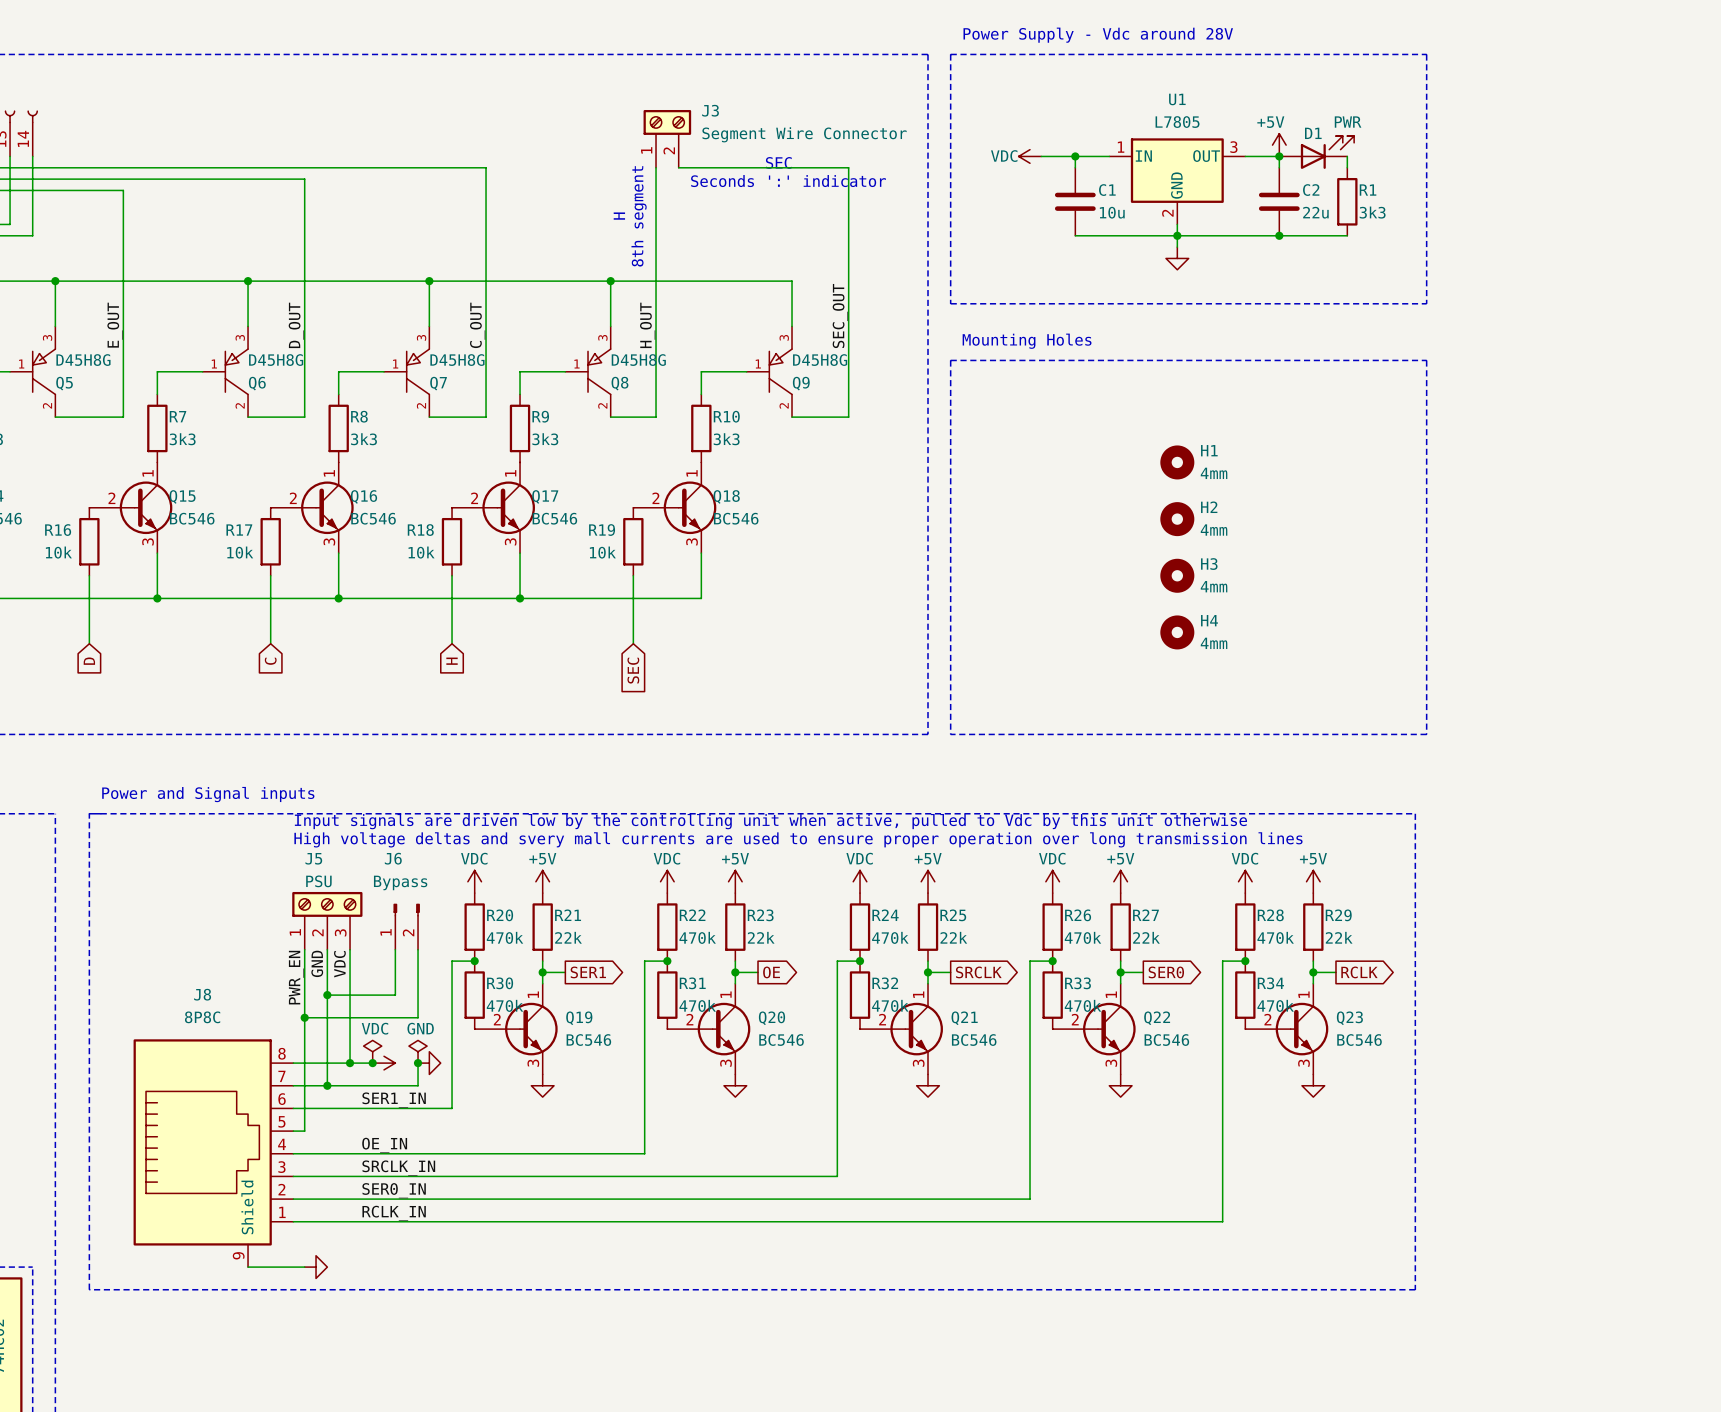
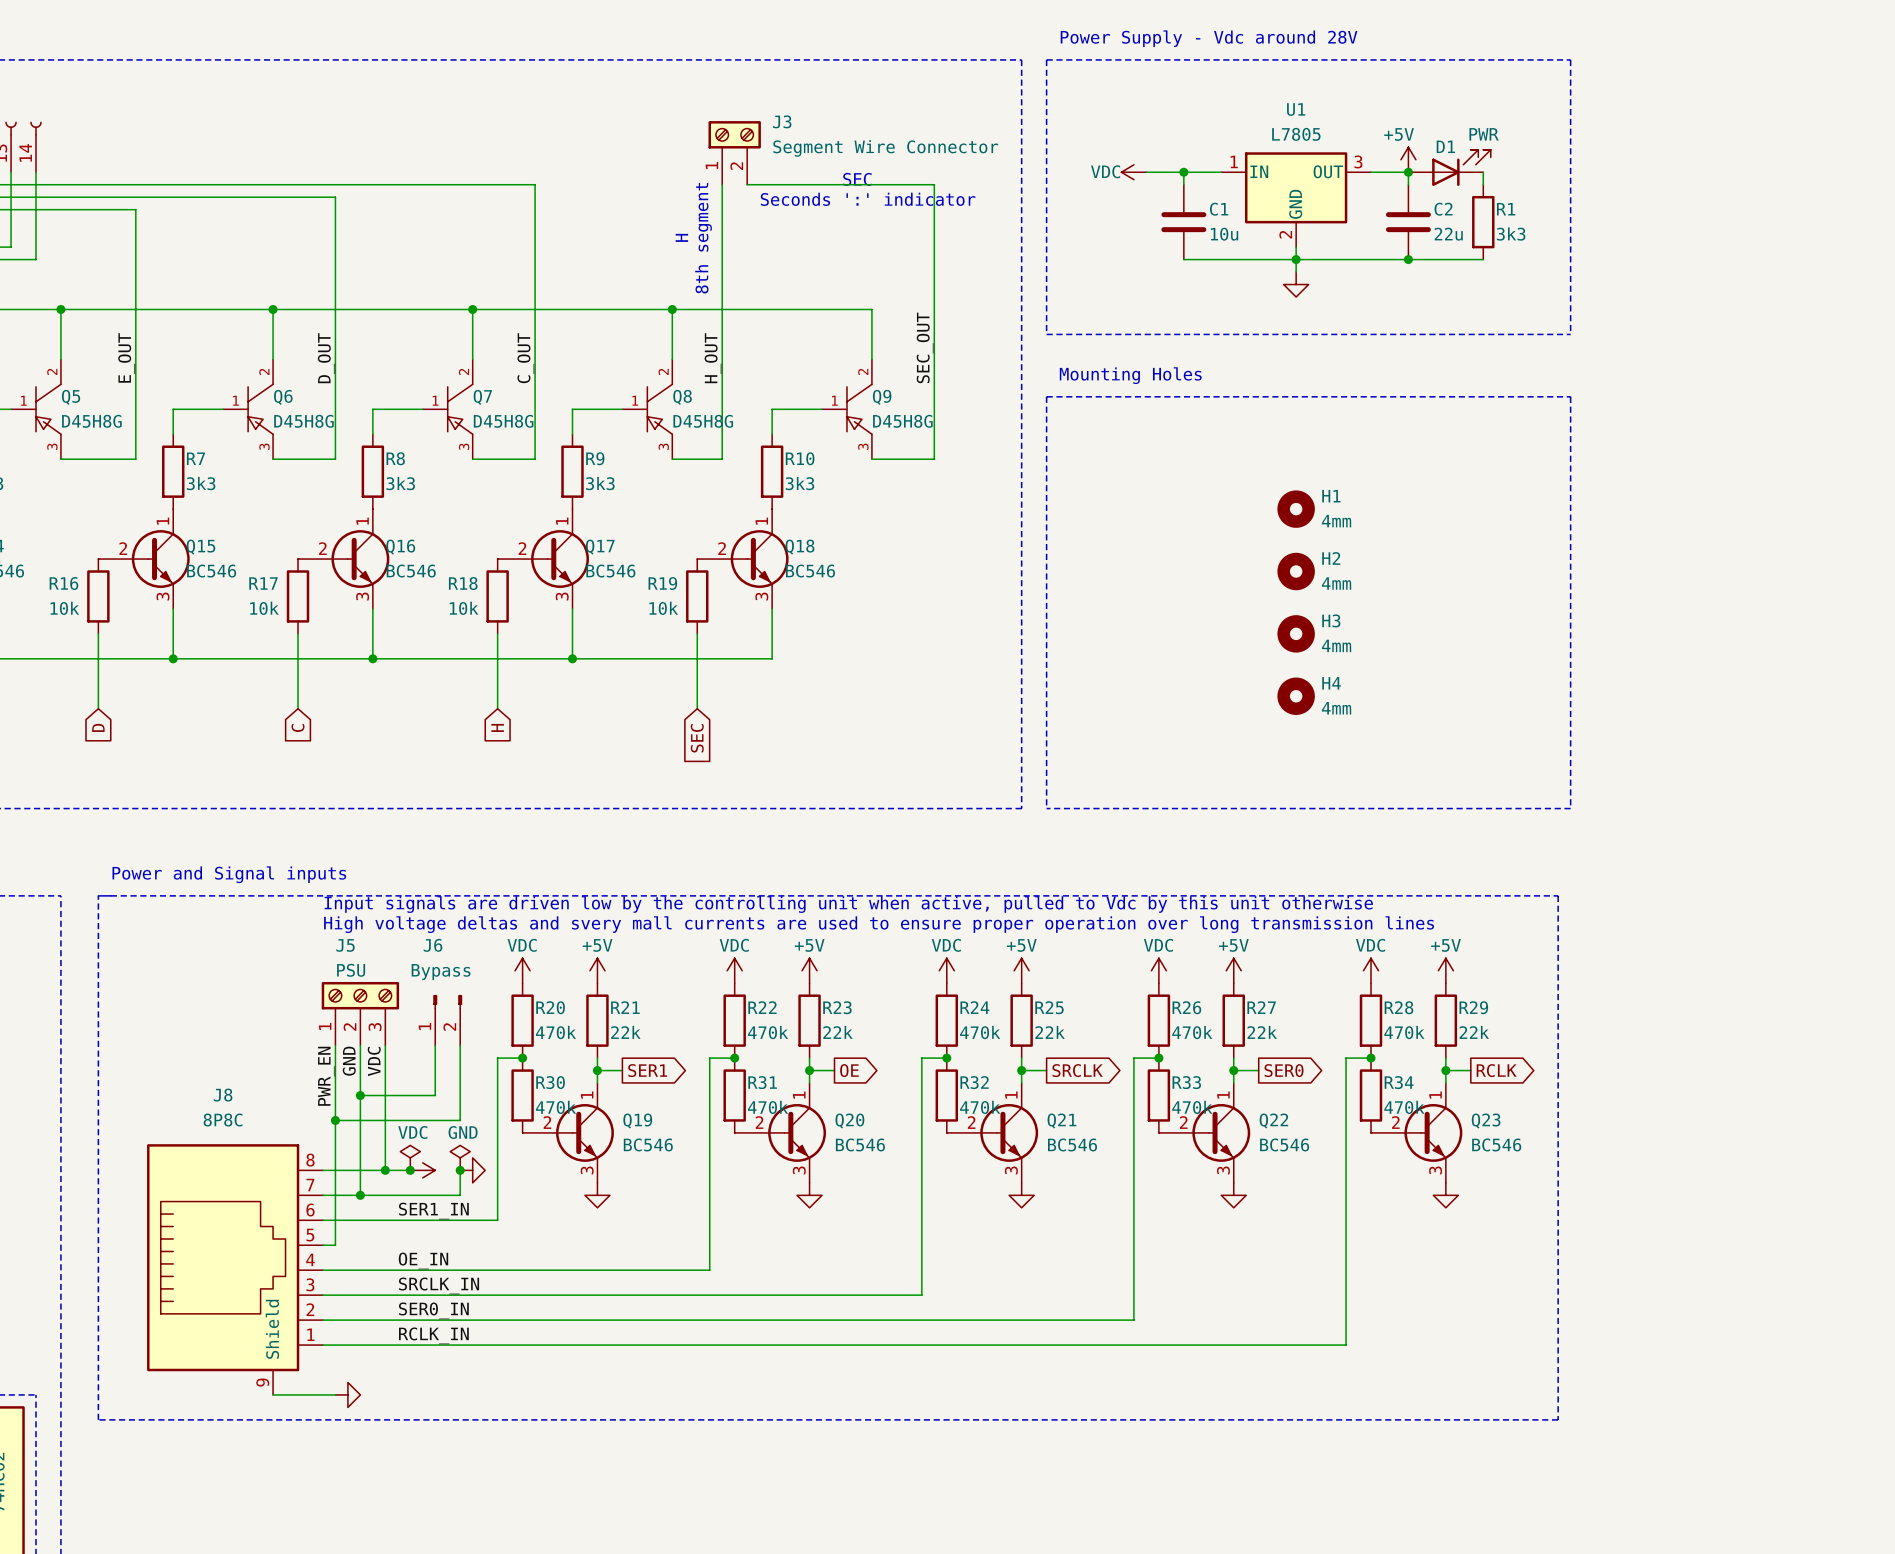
Q5 flip: as is (44, 371) -> up-down (48, 409)
Q6 flip: as is (236, 371) -> up-down (260, 409)
Q7 flip: as is (418, 371) -> up-down (460, 409)
Q8 flip: as is (599, 371) -> up-down (659, 409)
Q9 flip: as is (780, 371) -> up-down (859, 409)

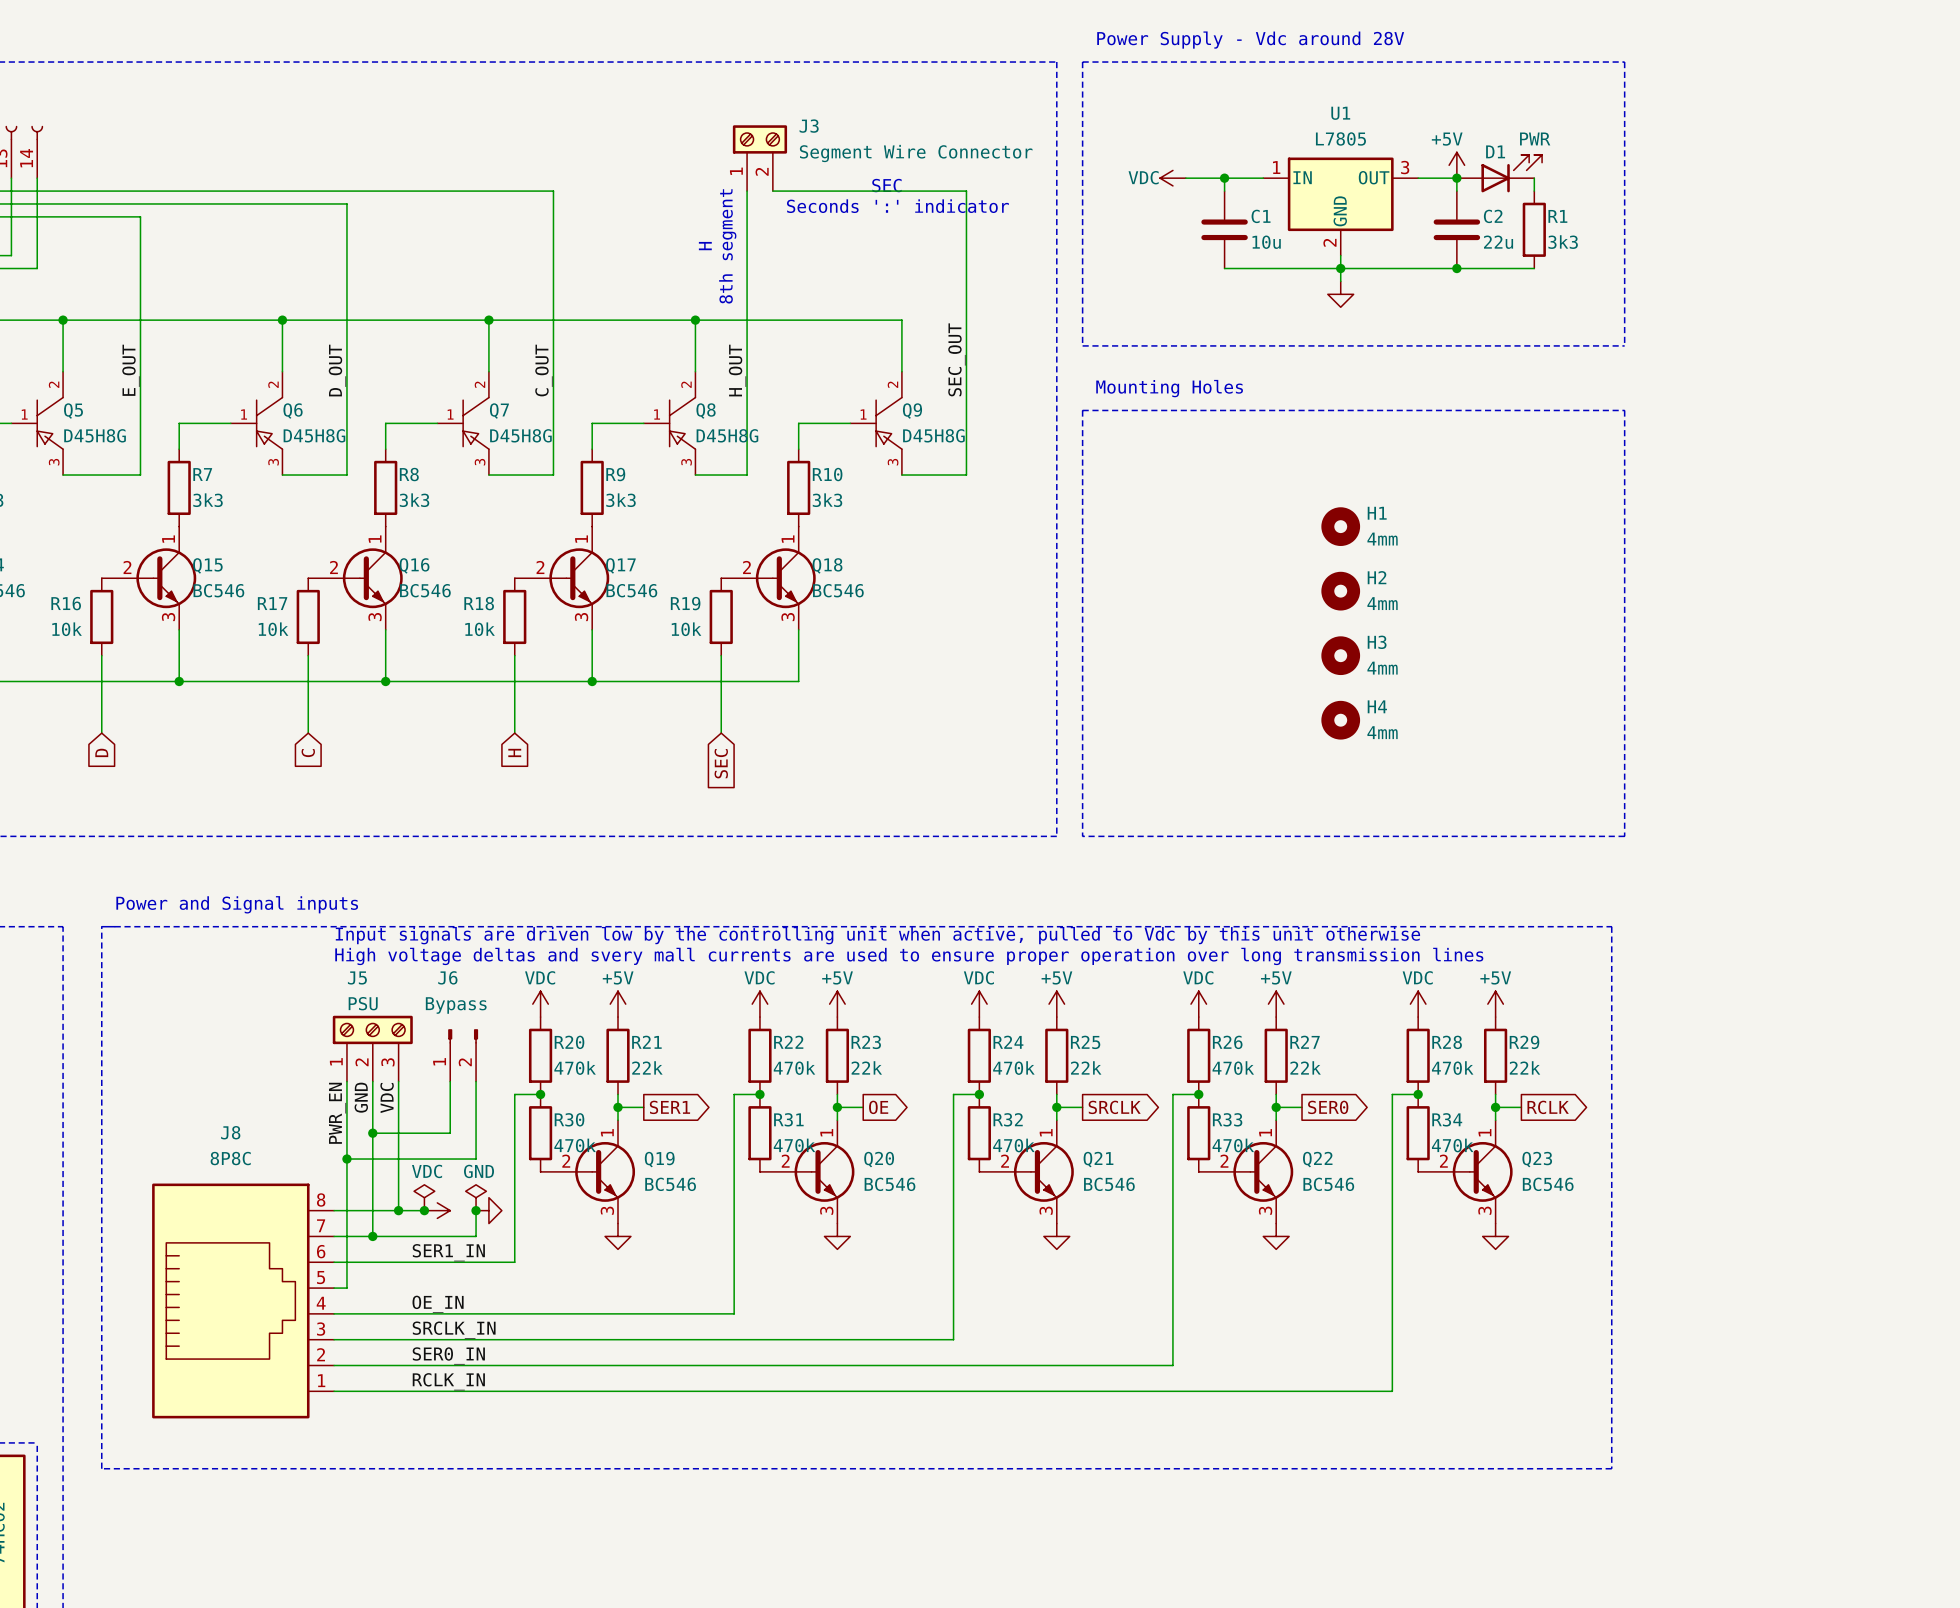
J8 symbol: [147, 1144, 323, 1395] -> [152, 1183, 335, 1419]
wire: (273, 1394) (335, 1394) -> none
power symbol: (347, 1394) -> none

